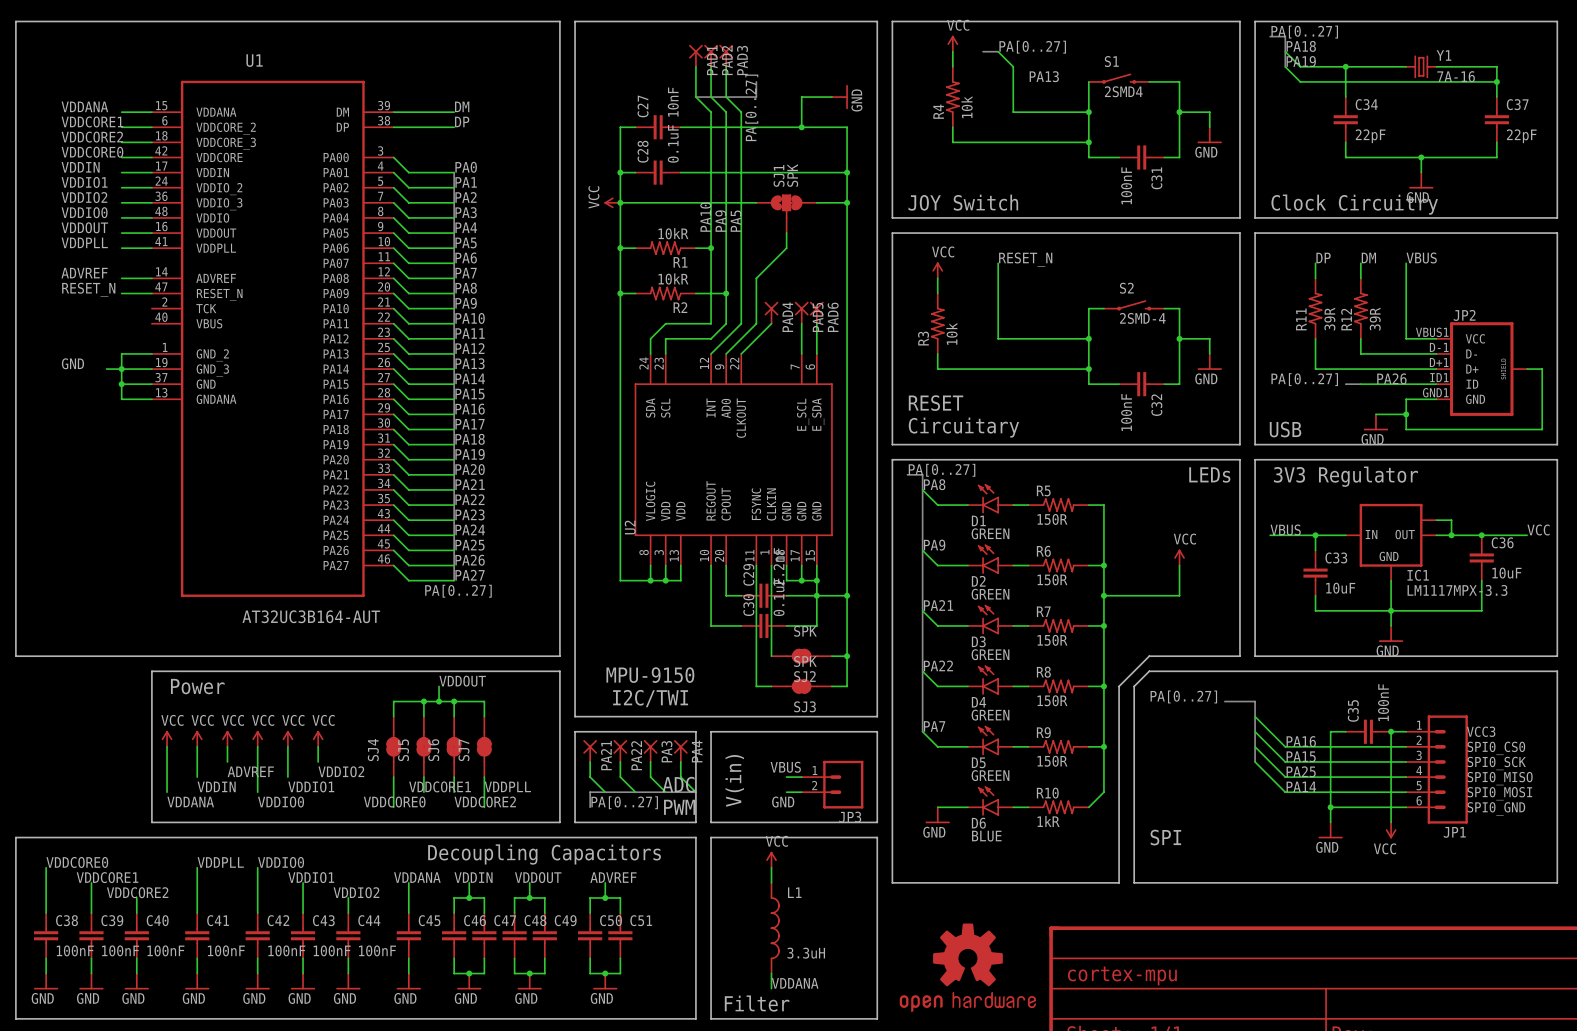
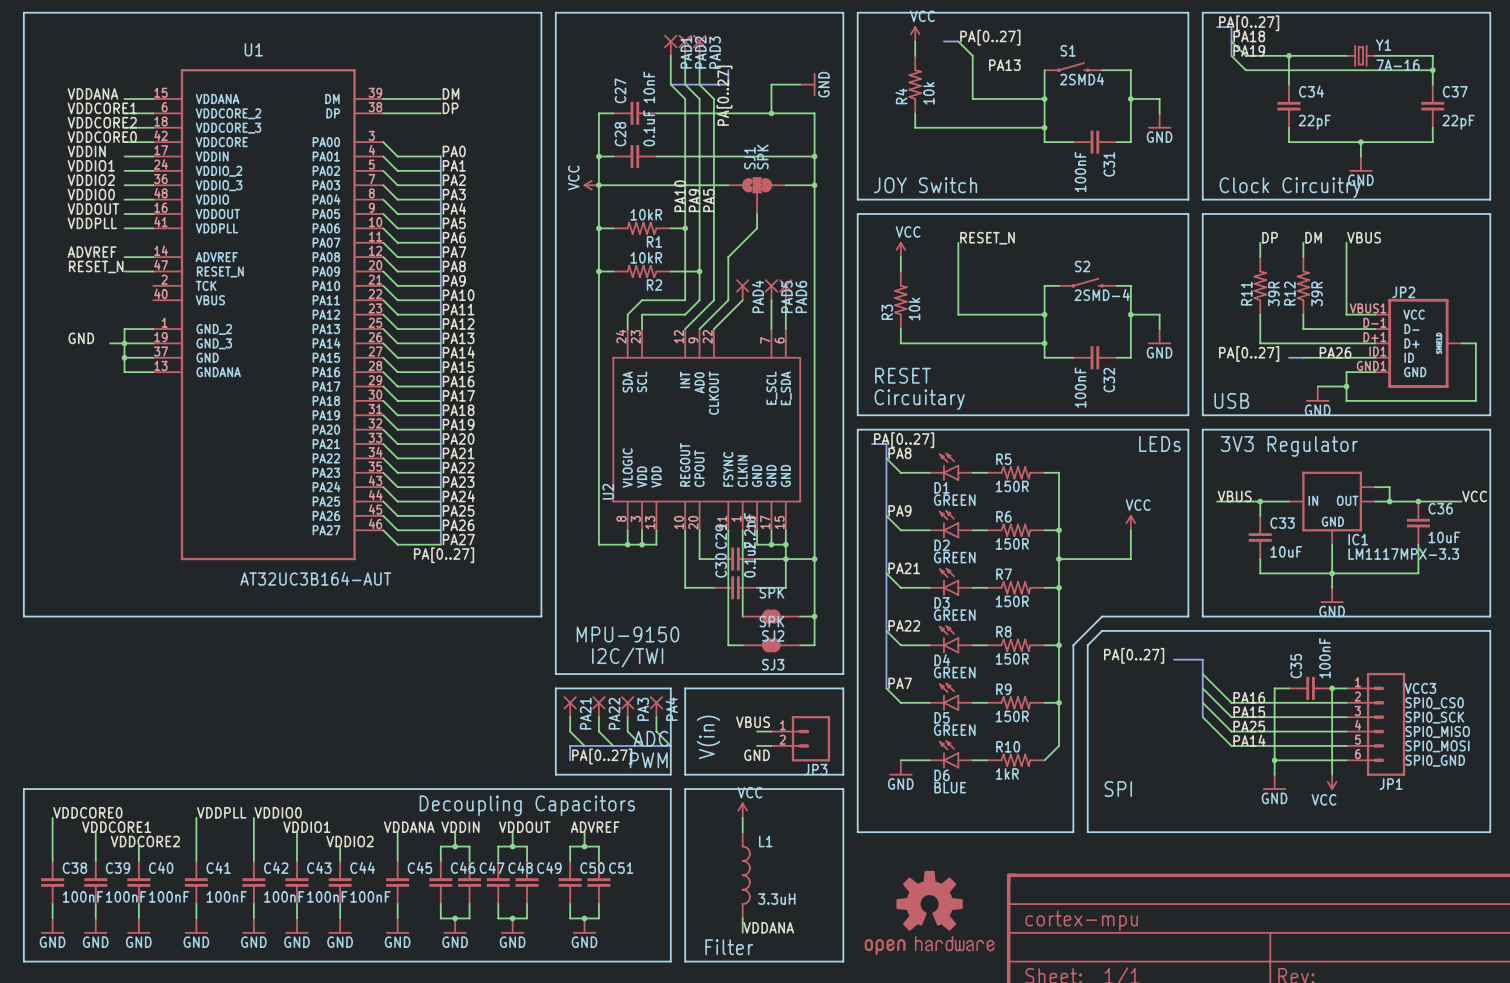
line: (151, 671) (151, 822) (559, 822) (559, 671) (151, 671) -> none
label: VDDOUT (462, 681) -> none
text: Power (197, 686) -> none
wire: (439, 686) (439, 701) -> none
wire: (423, 701) (423, 716) -> none
junction: (423, 701) -> none
junction: (439, 701) -> none
wire: (454, 701) (454, 716) -> none
junction: (454, 701) -> none
wire: (393, 716) (393, 701) (484, 701) (484, 716) -> none
power symbol: VCC (167, 738) -> none
power symbol: VCC (197, 738) -> none
power symbol: VCC (227, 738) -> none
power symbol: VCC (257, 738) -> none
power symbol: VCC (287, 738) -> none
power symbol: VCC (318, 738) -> none
wire: (167, 746) (167, 792) -> none
wire: (197, 746) (197, 777) -> none
wire: (227, 746) (227, 761) -> none
wire: (257, 746) (257, 792) -> none
wire: (287, 746) (287, 777) -> none
wire: (318, 746) (318, 761) -> none
SJ4: (393, 746) -> none
SJ5: (423, 746) -> none
SJ6: (454, 746) -> none
SJ7: (484, 746) -> none
label: ADVREF (250, 771) -> none
label: VDDIO2 (341, 771) -> none
wire: (393, 777) (393, 807) -> none
wire: (423, 777) (423, 792) -> none
wire: (454, 777) (454, 792) -> none
wire: (484, 777) (484, 807) -> none
label: VDDIN (216, 786) -> none
label: VDDIO1 (311, 786) -> none
label: VDDCORE1 (440, 786) -> none
label: VDDPLL (507, 786) -> none
label: VDDANA (190, 802) -> none
label: VDDIO0 (281, 802) -> none
label: VDDCORE0 (394, 802) -> none
label: VDDCORE2 (485, 802) -> none

